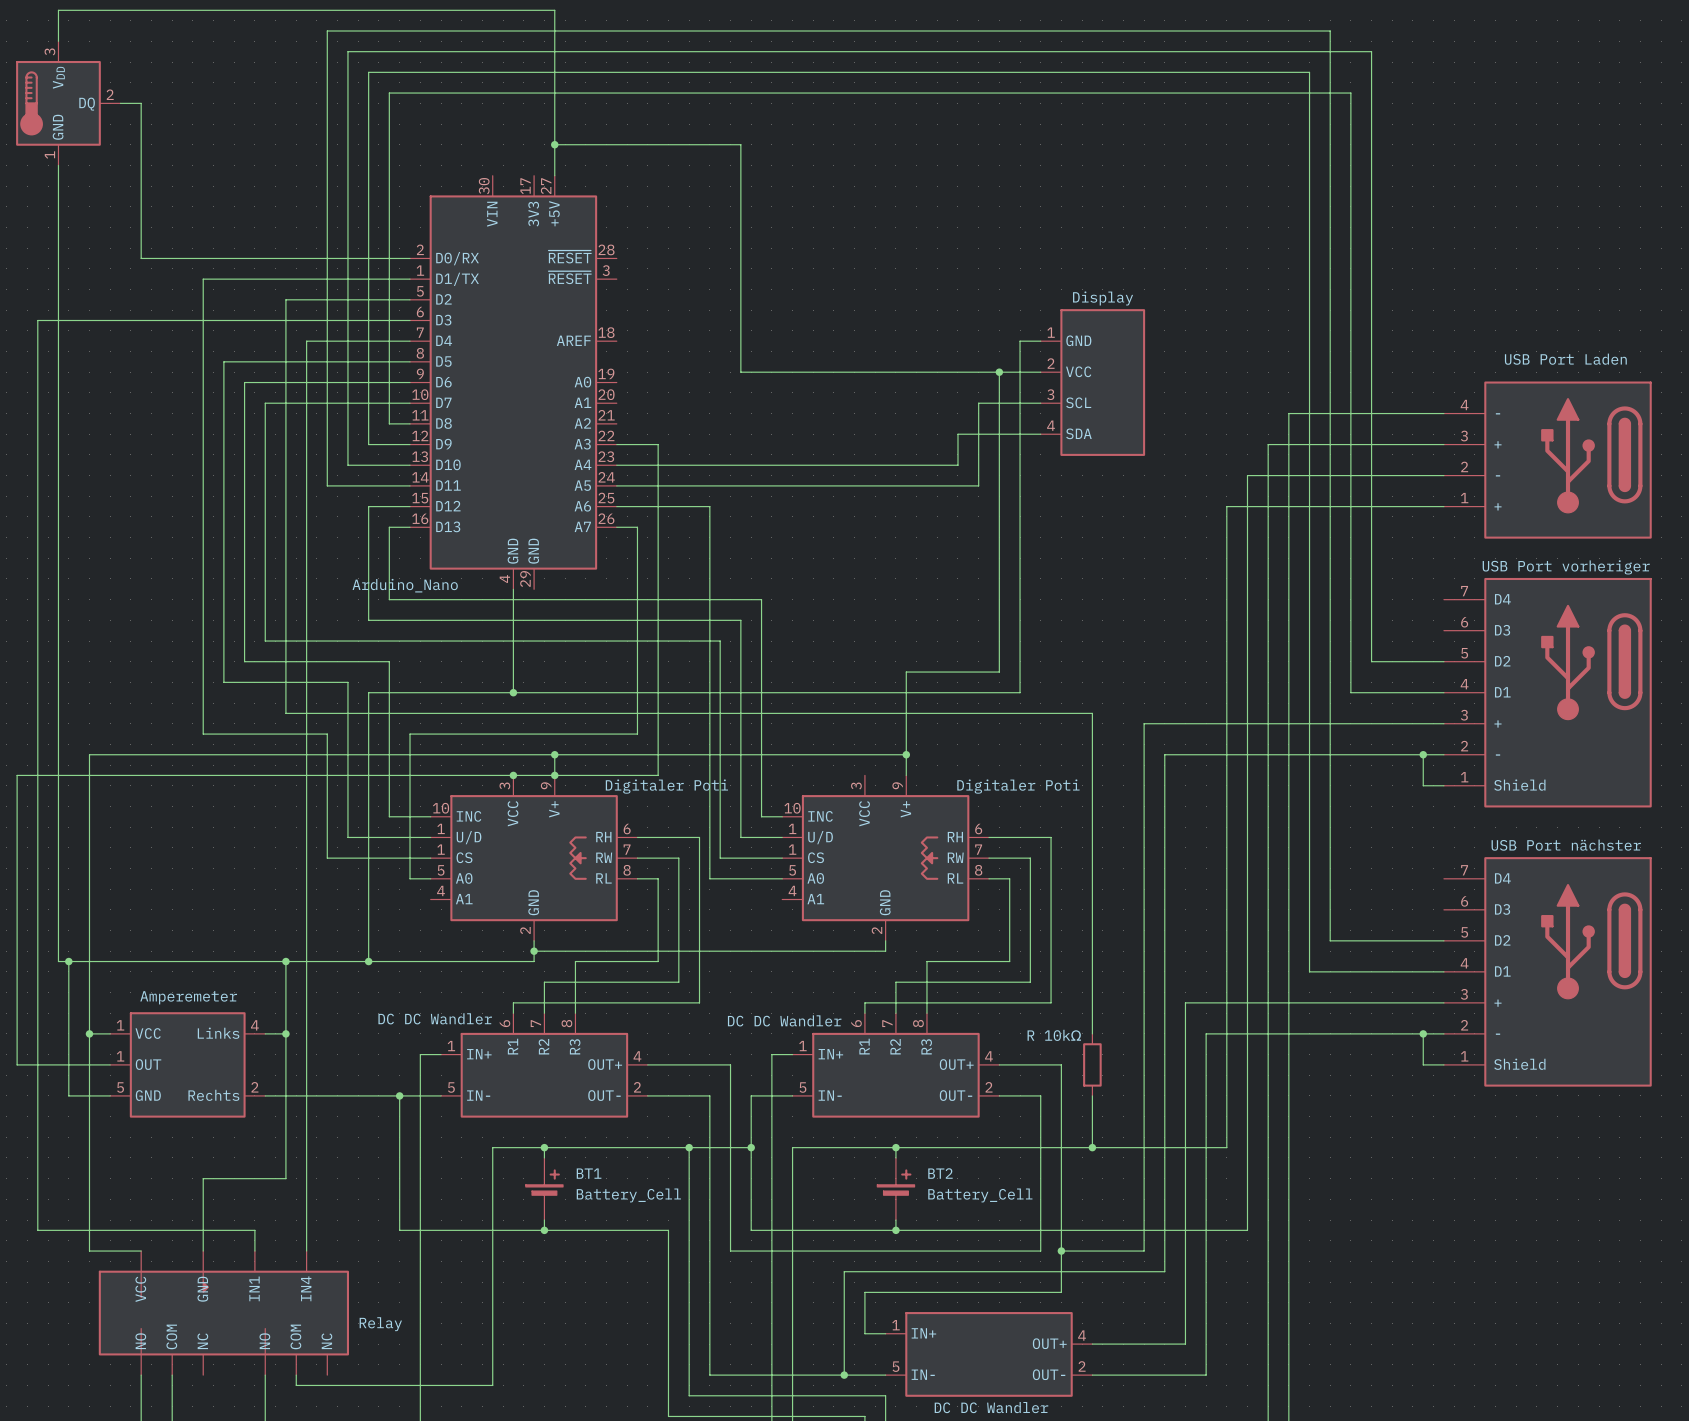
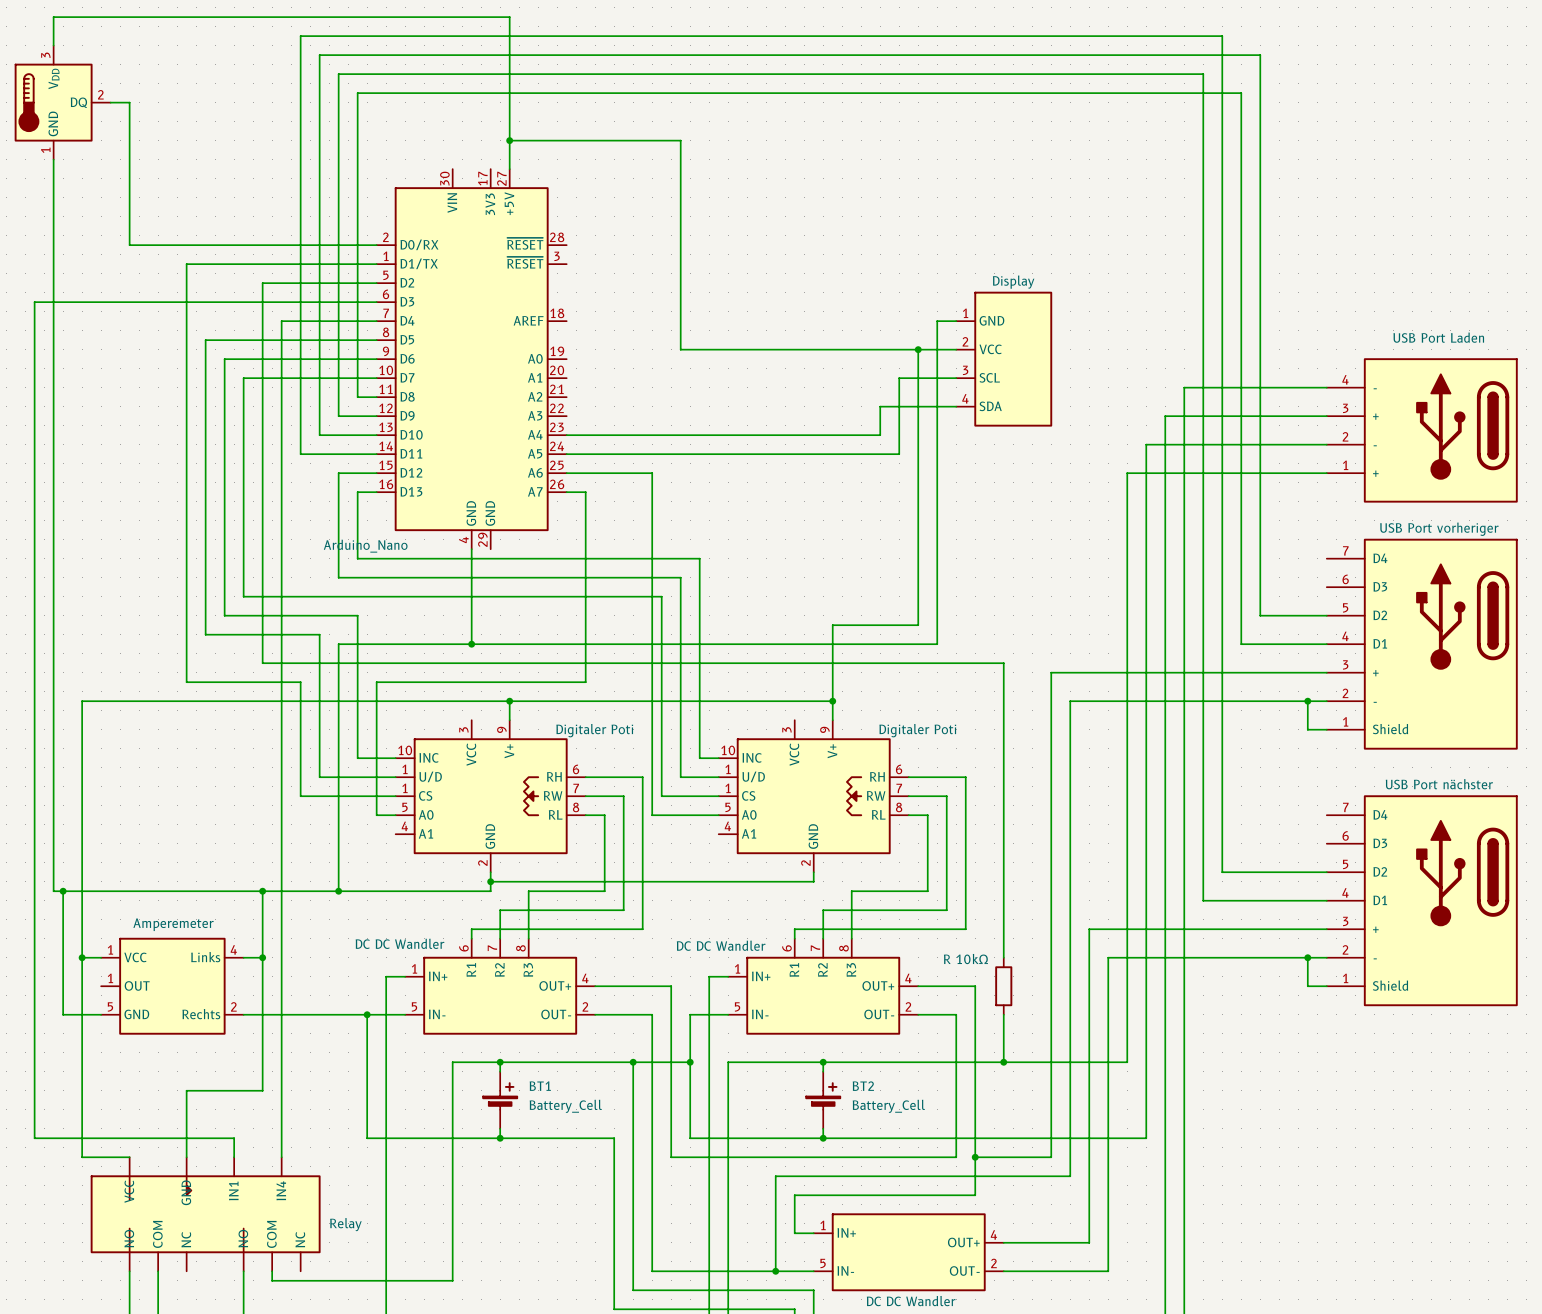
wire: (616, 444) (658, 444) (658, 775) (17, 775) (17, 1064) (110, 1064) -> none
junction: (513, 775) -> none
junction: (554, 775) -> none

